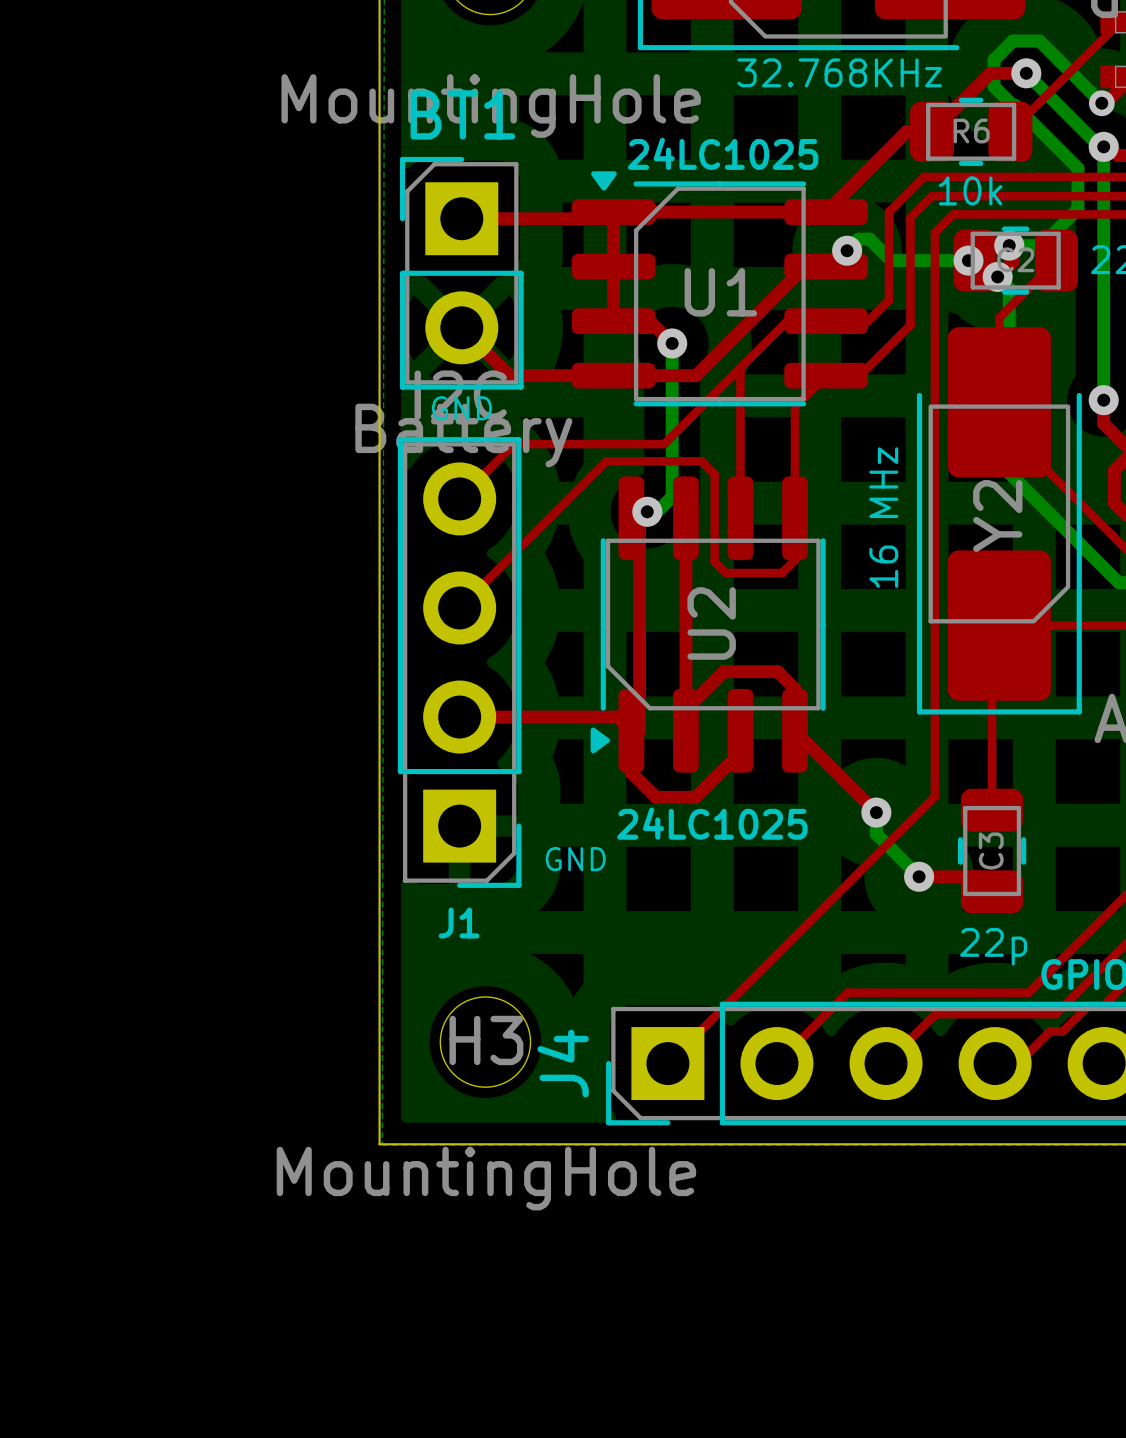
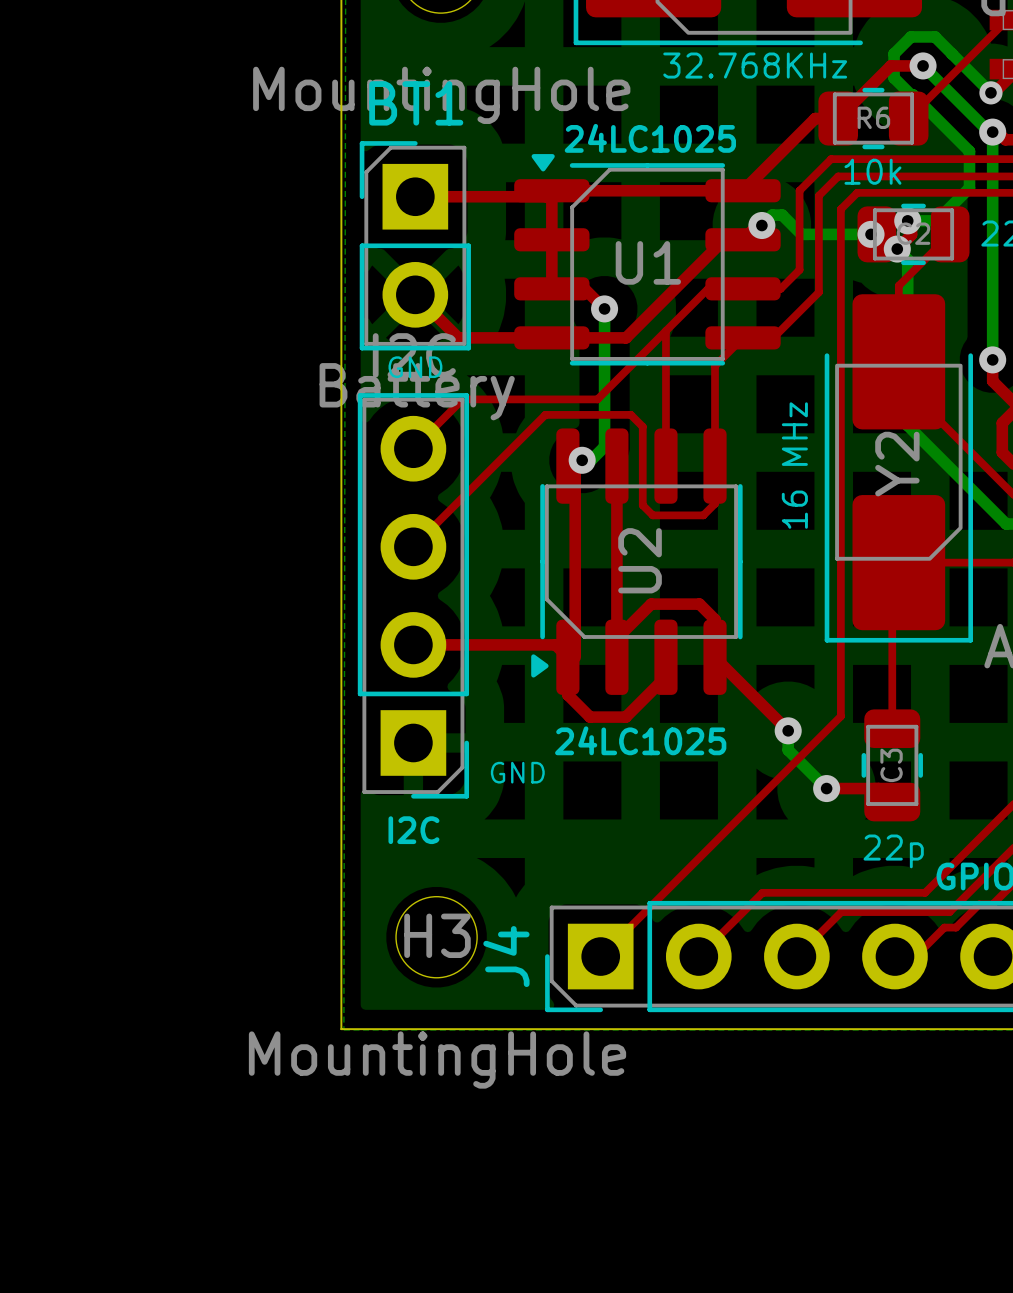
J1 name: J1 (459, 923) -> I2C (413, 830)

